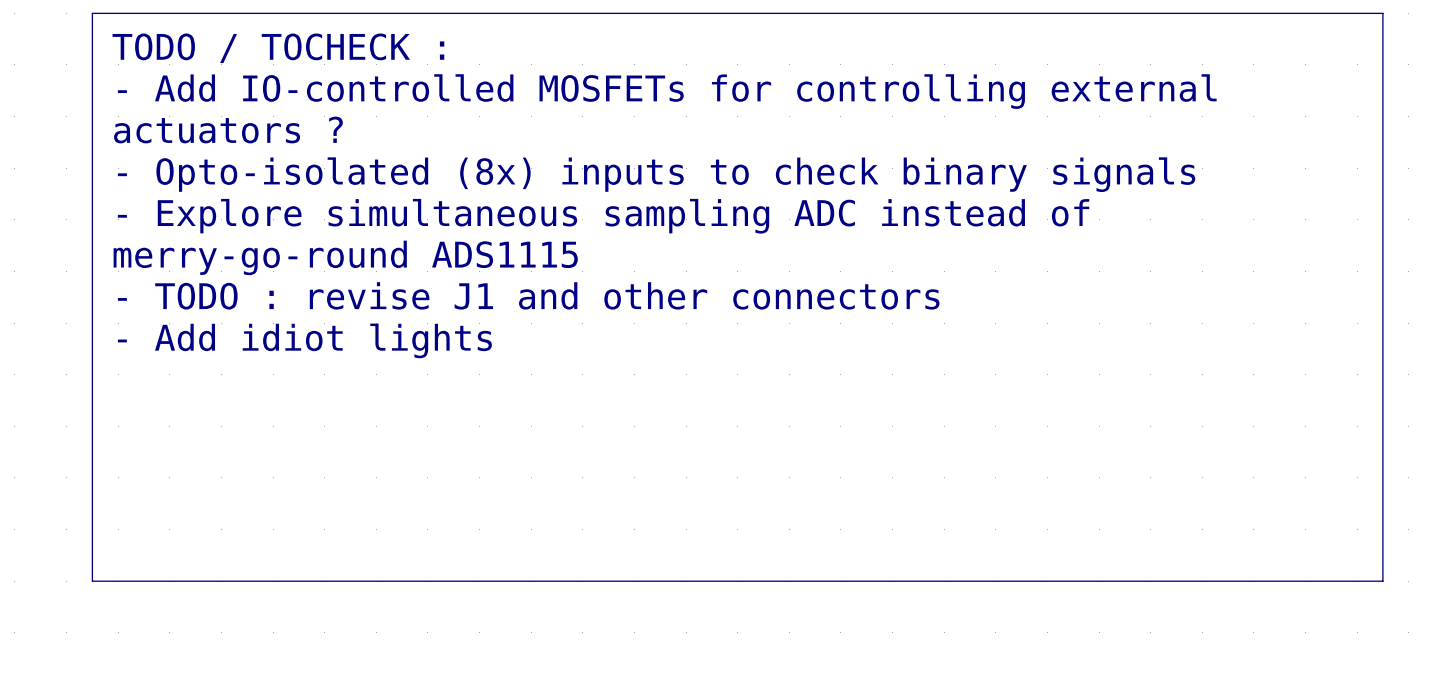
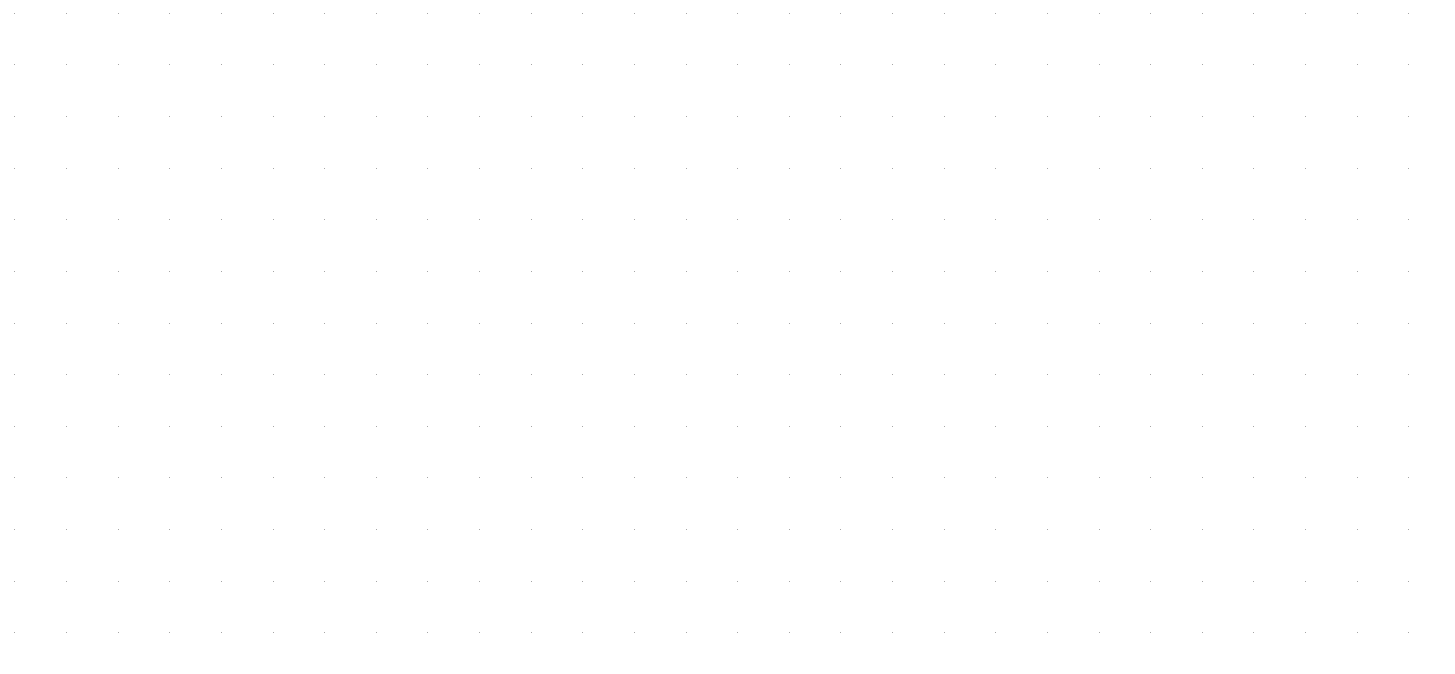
line: (92, 13) (1382, 13) (1382, 581) (92, 581) (92, 13) -> none
text: TODO / TOCHECK : (278, 48) -> none
text: - Add IO-controlled MOSFETs for controlling external (667, 91) -> none
text: actuators ? (228, 129) -> none
text: - Opto-isolated (8x) inputs to check binary signals (656, 174) -> none
text: - Explore simultaneous sampling ADC instead of (603, 216) -> none
text: merry-go-round ADS1115 (345, 257) -> none
text: - TODO : revise J1 and other connectors (528, 295) -> none
text: - Add idiot lights (304, 340) -> none

